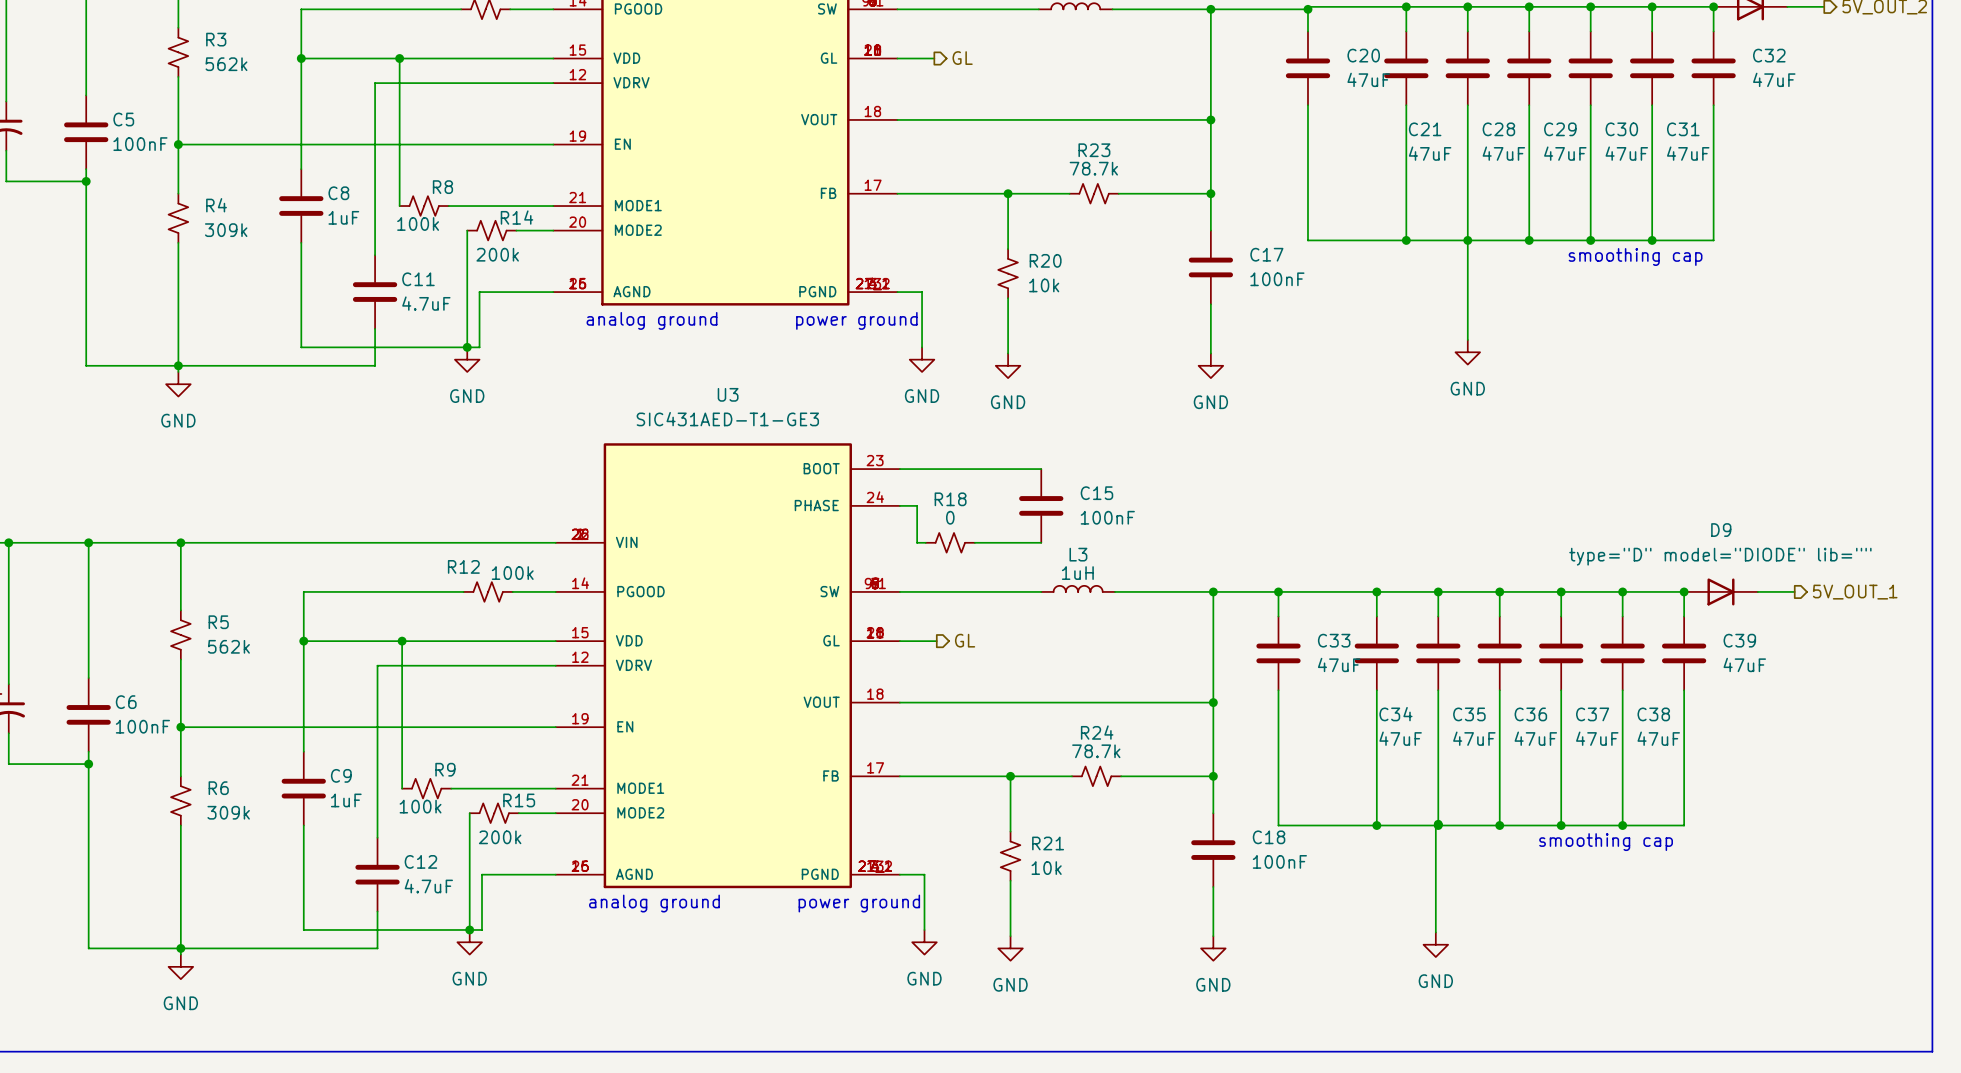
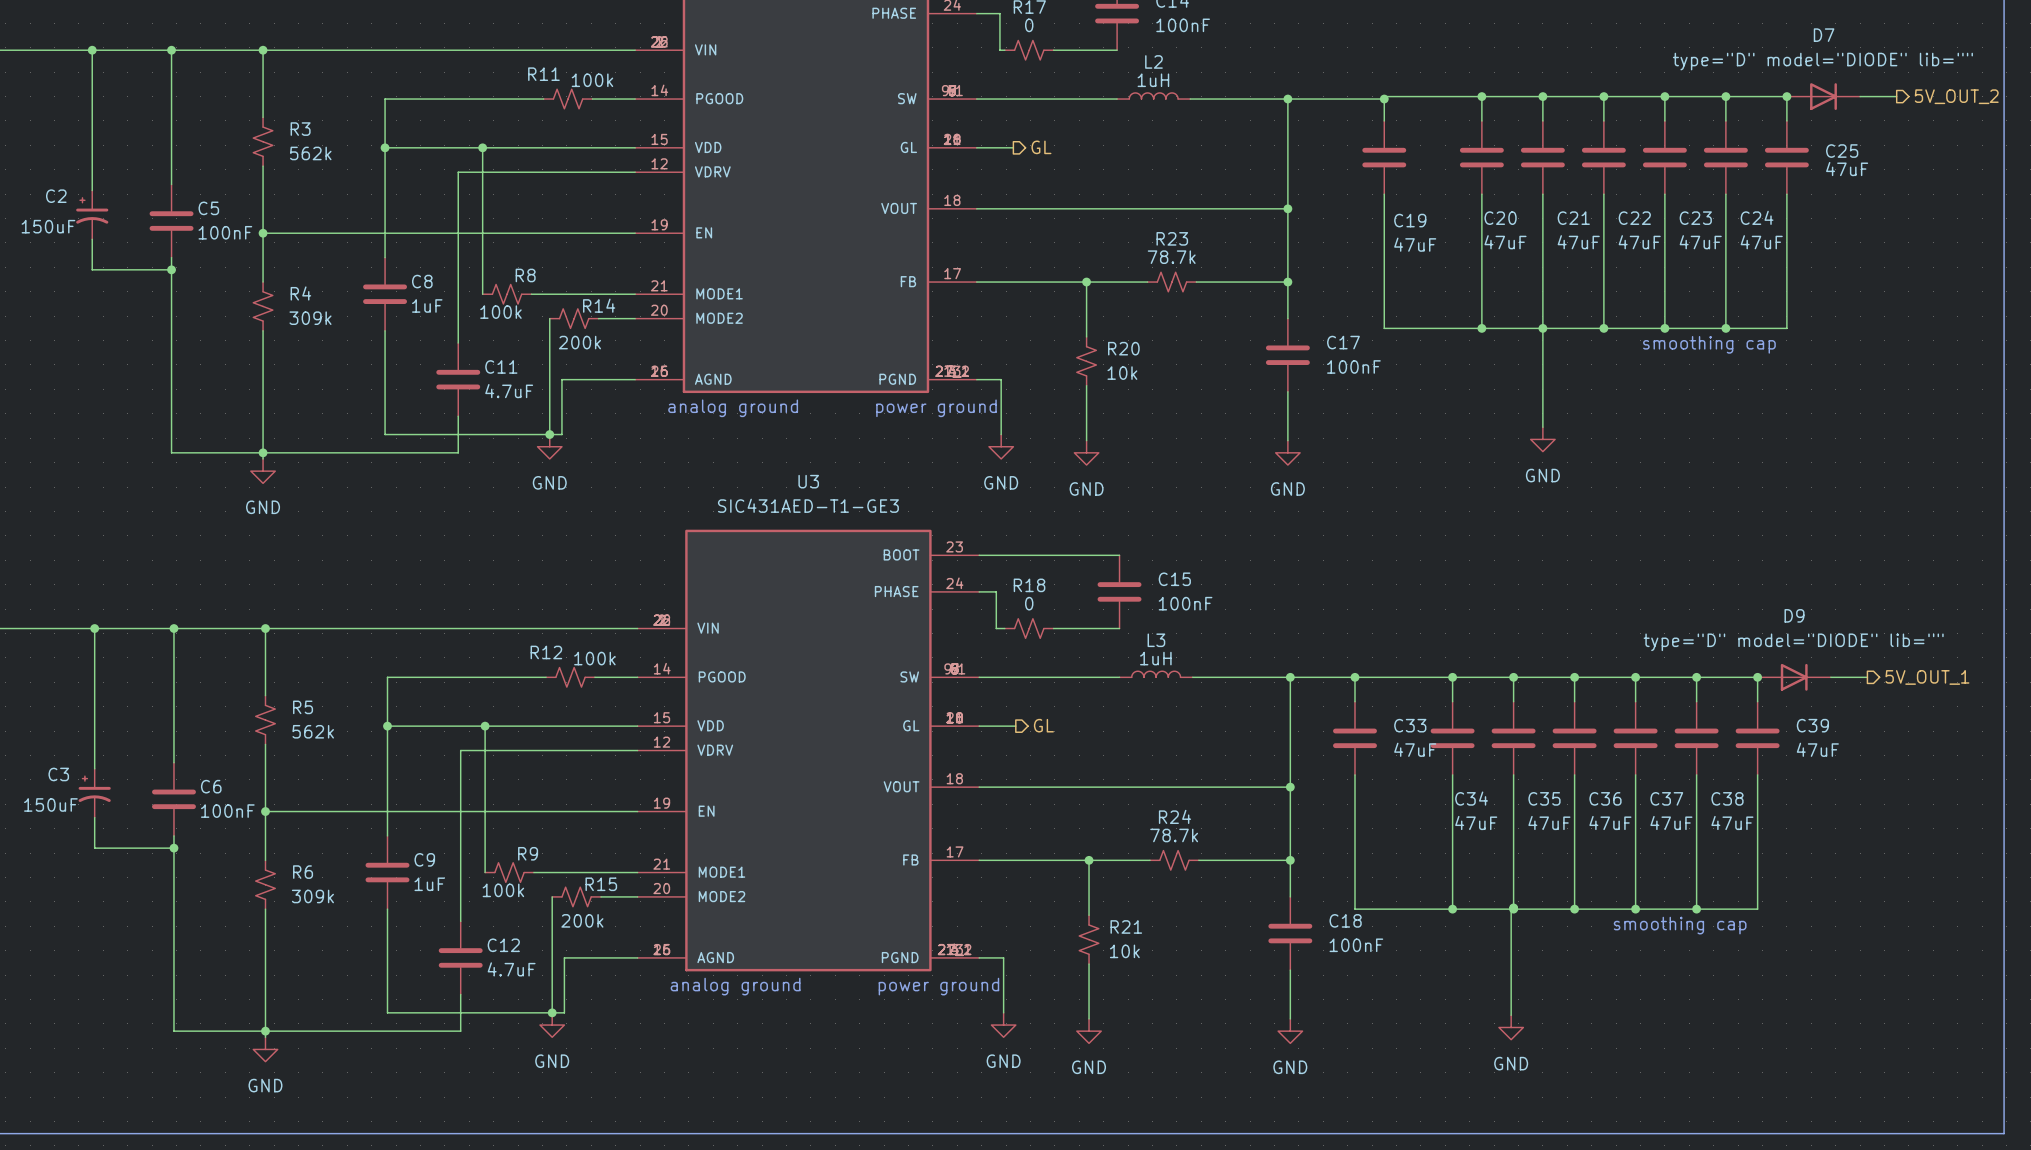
C20 name: C20 (1363, 55) -> C19 (1410, 220)
C32 name: C32 (1769, 55) -> C25 (1842, 151)
C20 value position: 47uF (1368, 79) -> 47uF (1415, 244)
C21 name: C21 (1425, 129) -> C20 (1500, 218)
C28 name: C28 (1498, 129) -> C21 (1573, 218)
C29 name: C29 (1560, 129) -> C22 (1634, 218)
C30 name: C30 (1621, 129) -> C23 (1695, 218)
C31 name: C31 (1683, 129) -> C24 (1757, 217)

